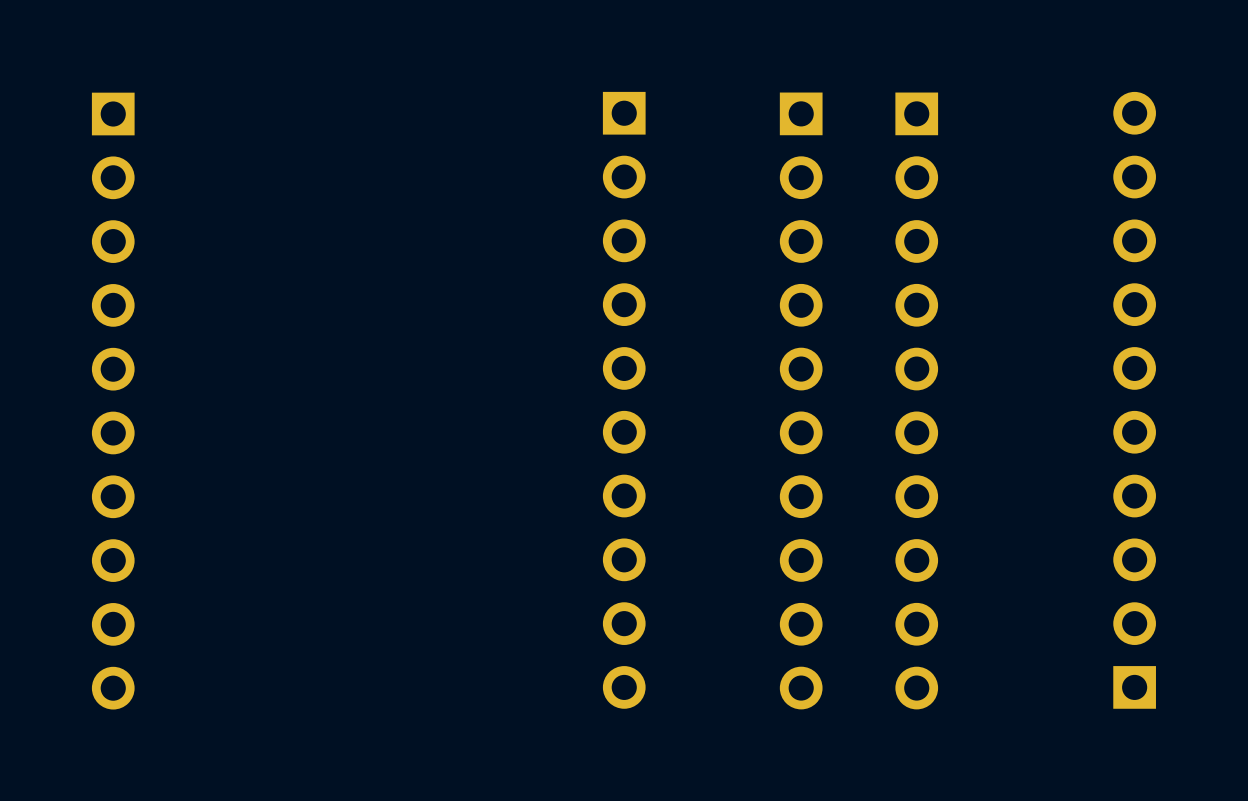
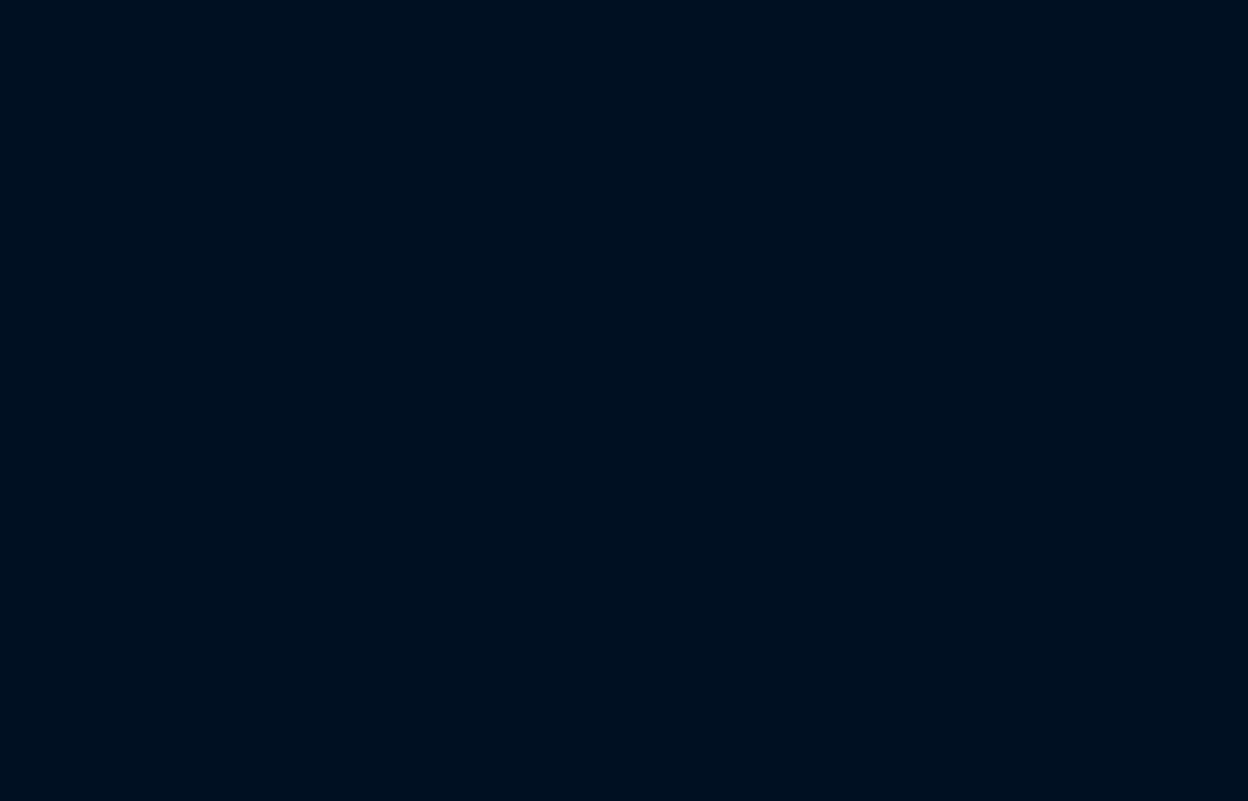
part: (624, 400) -> none
part: (801, 400) -> none
part: (916, 400) -> none
part: (1134, 400) -> none
part: (113, 401) -> none

